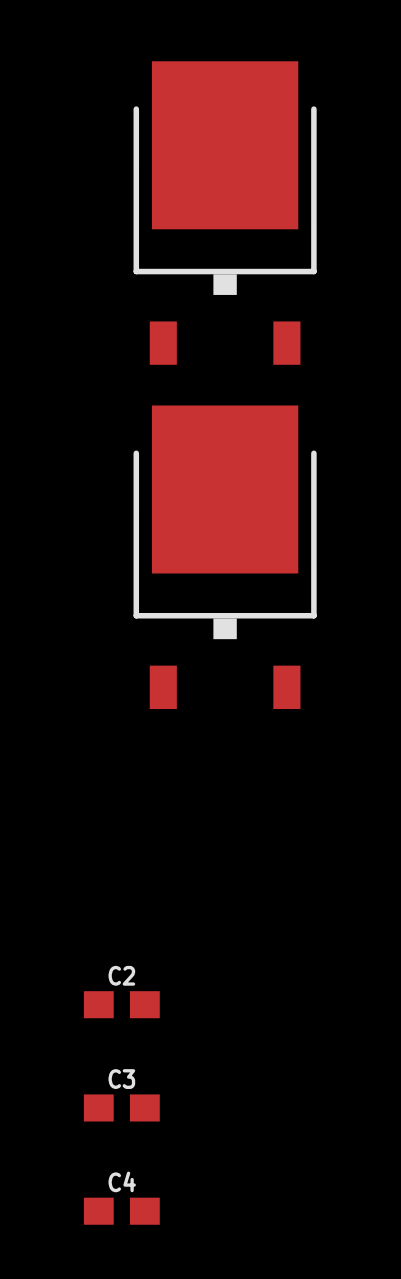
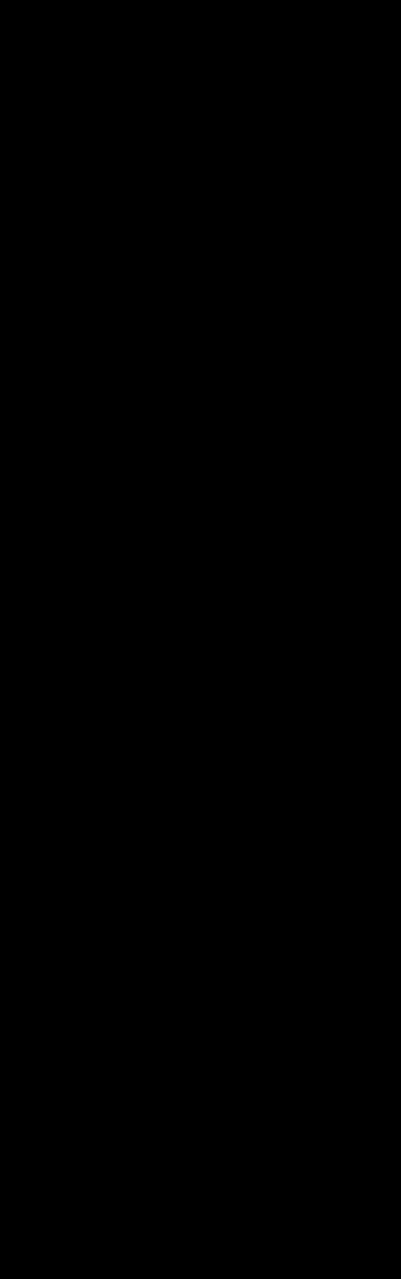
part: (225, 213) -> none
part: (225, 557) -> none
C2: (121, 1004) -> none
C3: (121, 1107) -> none
C4: (121, 1211) -> none

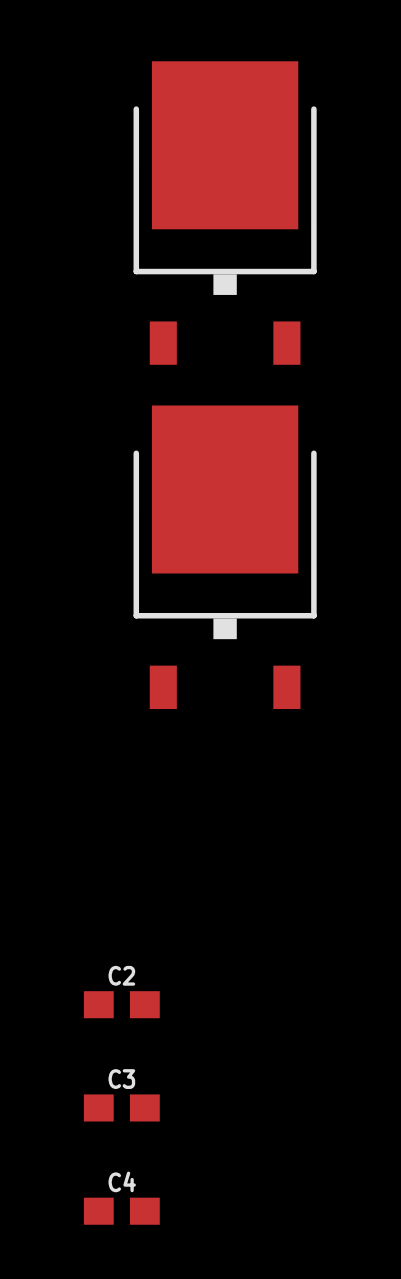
part: none -> (225, 213)
part: none -> (225, 557)
C2: none -> (121, 1004)
C3: none -> (121, 1107)
C4: none -> (121, 1211)

